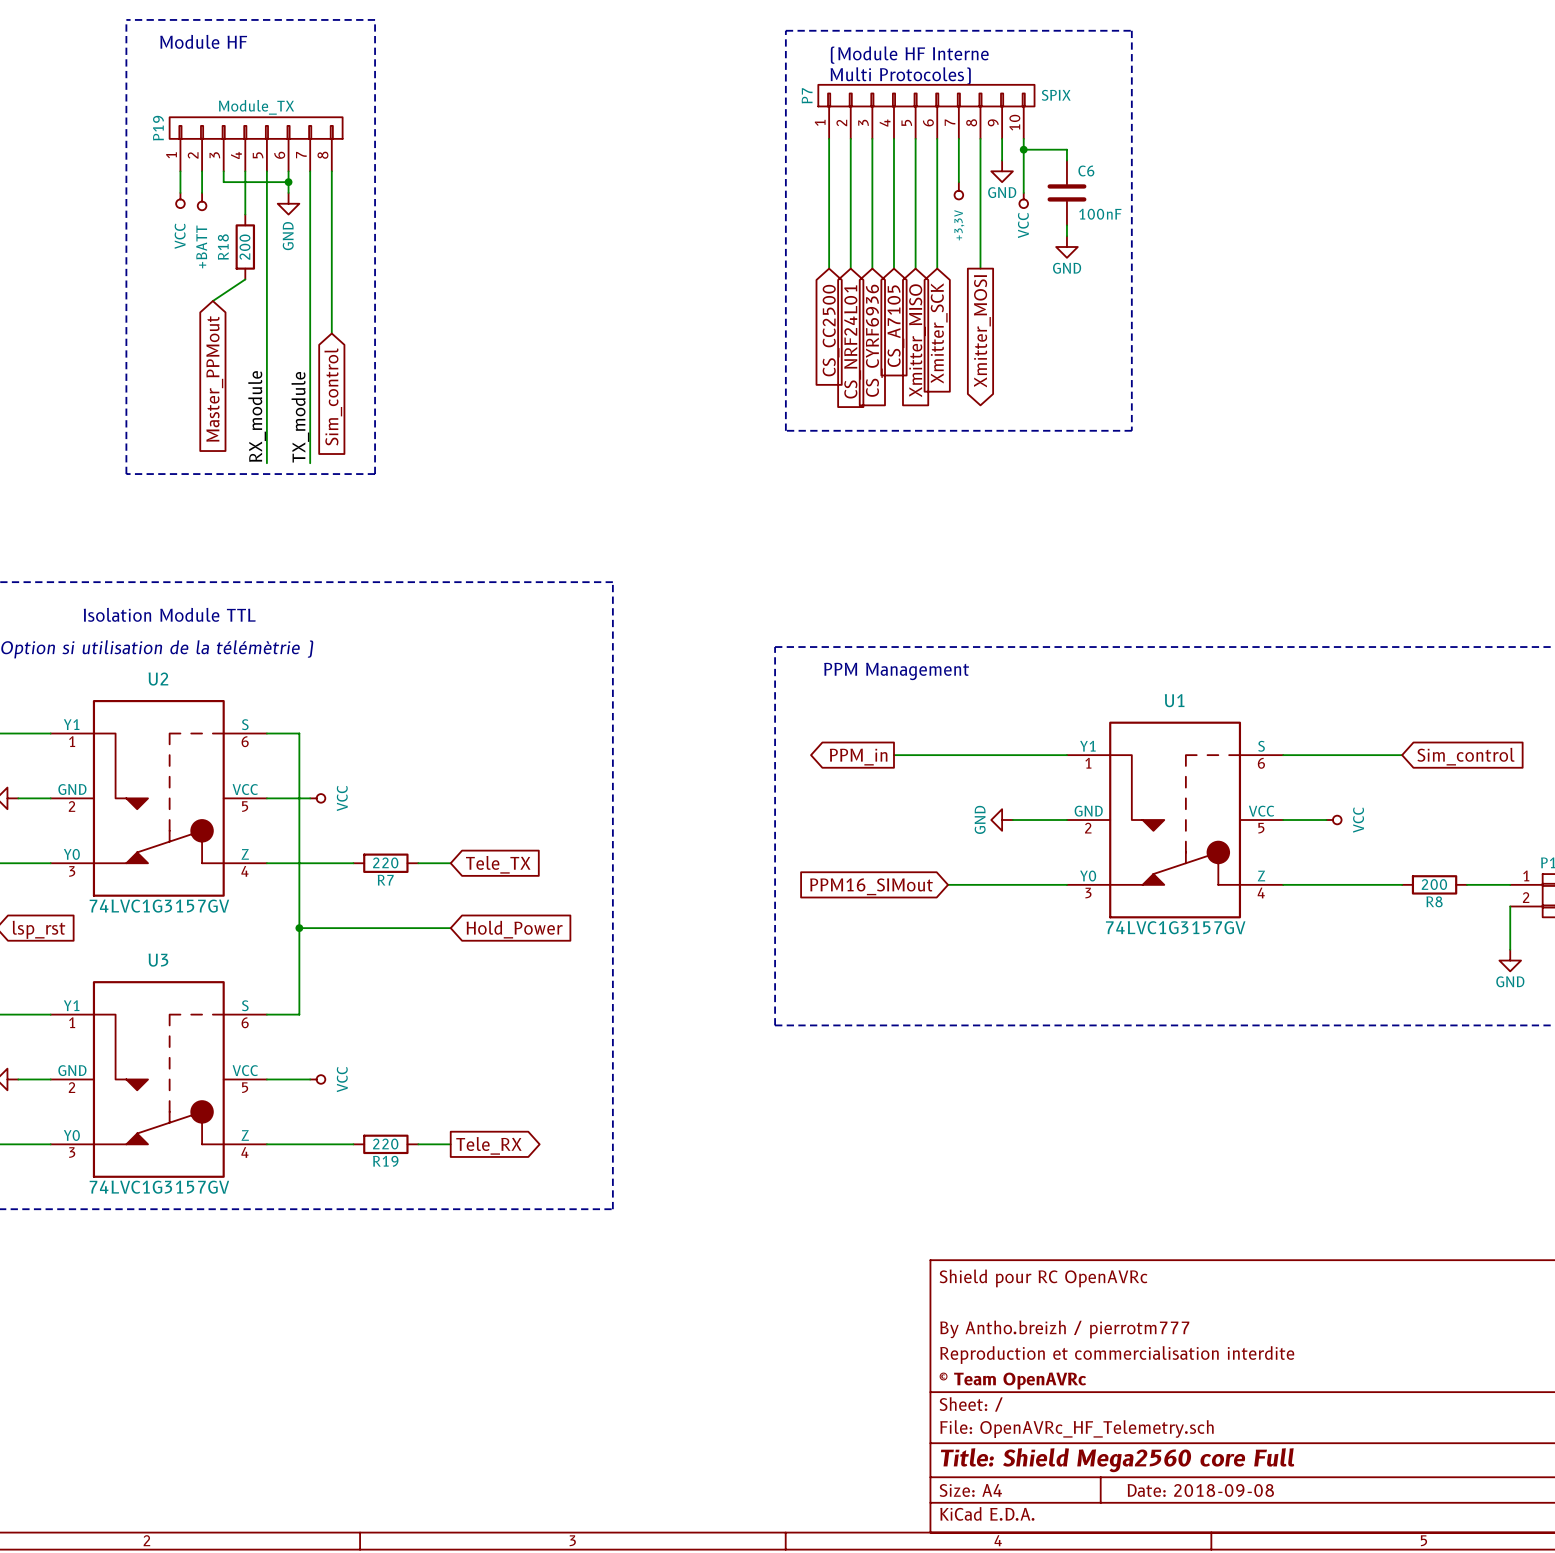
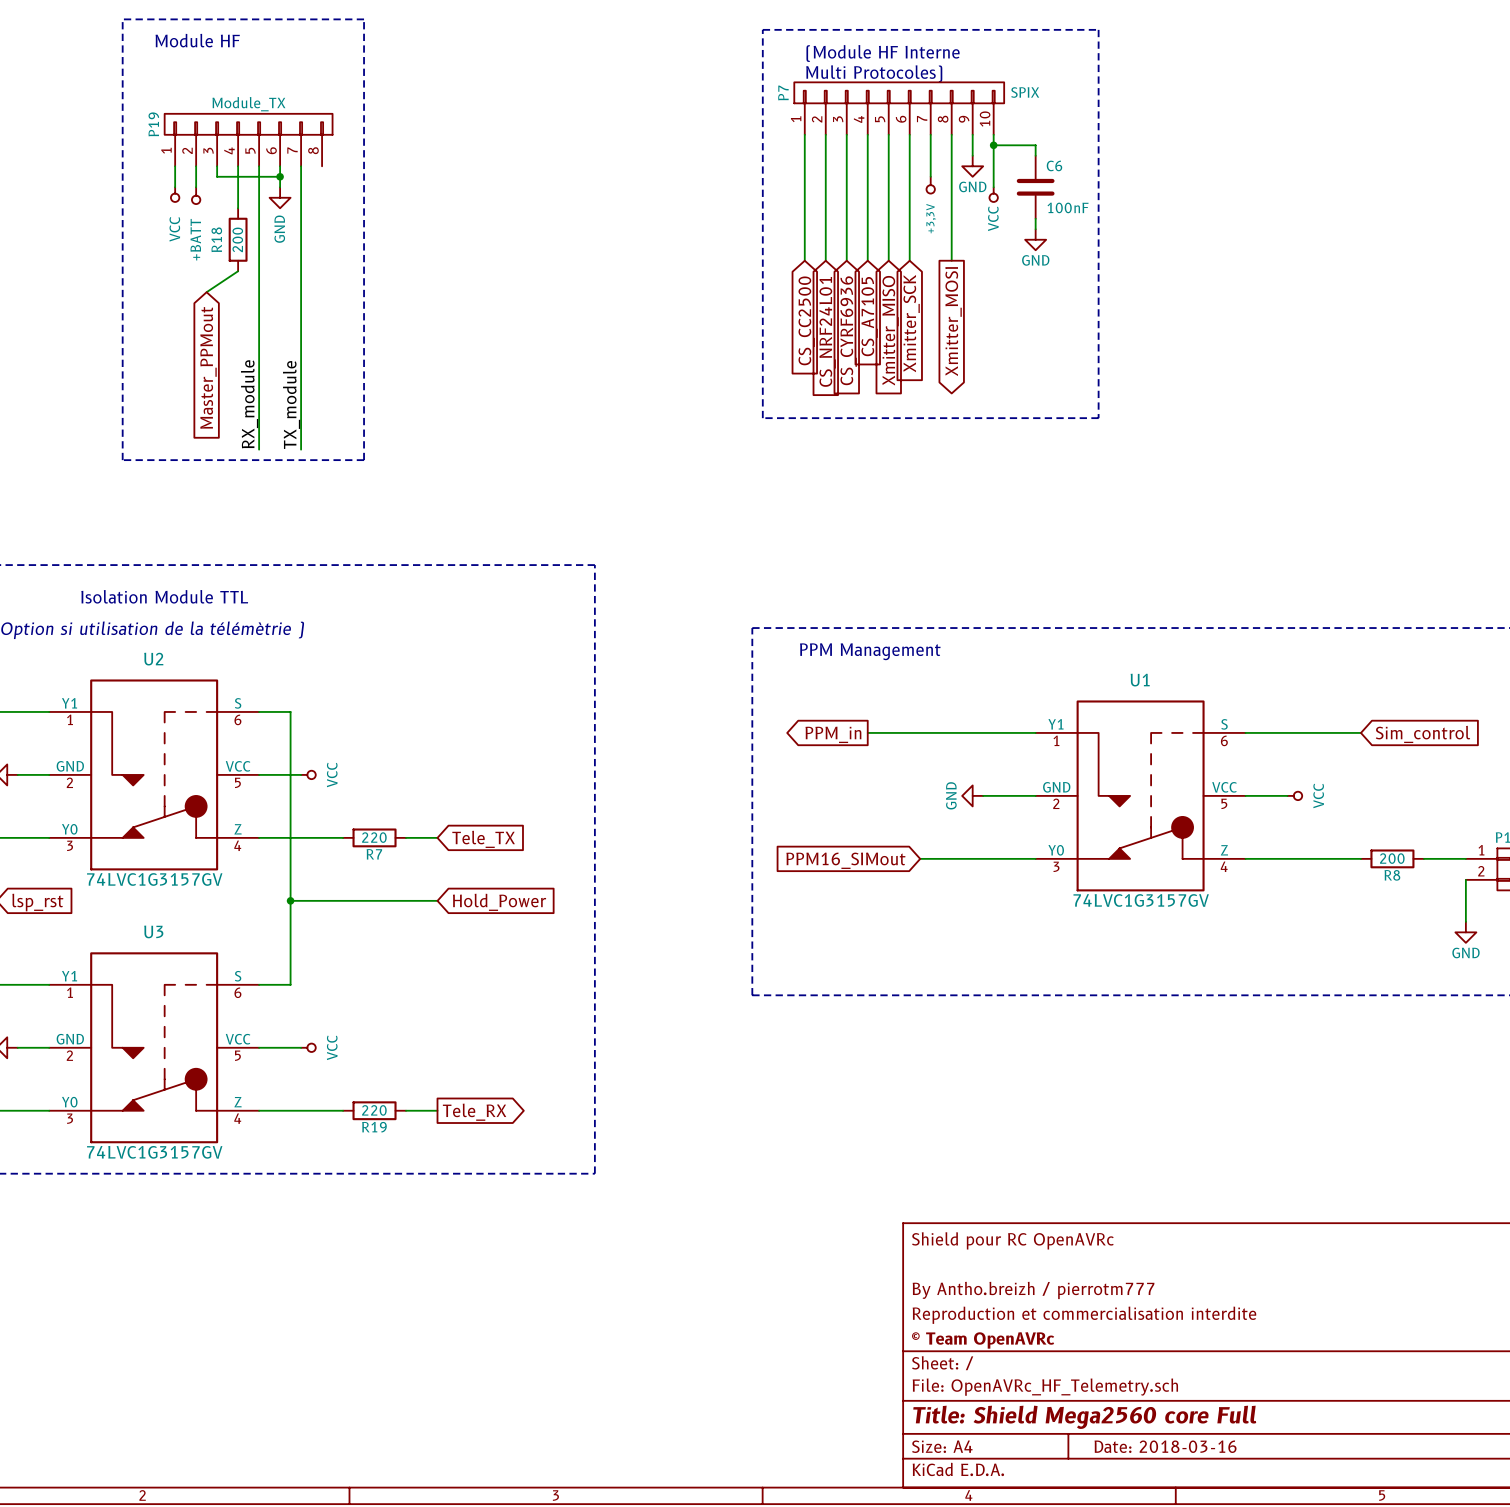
wire: (331, 171) (331, 333) -> none
global label: Sim_control (333, 396) -> none
title block: Date: 2018-09-08 (1200, 1490) -> Date: 2018-03-16 (1165, 1446)

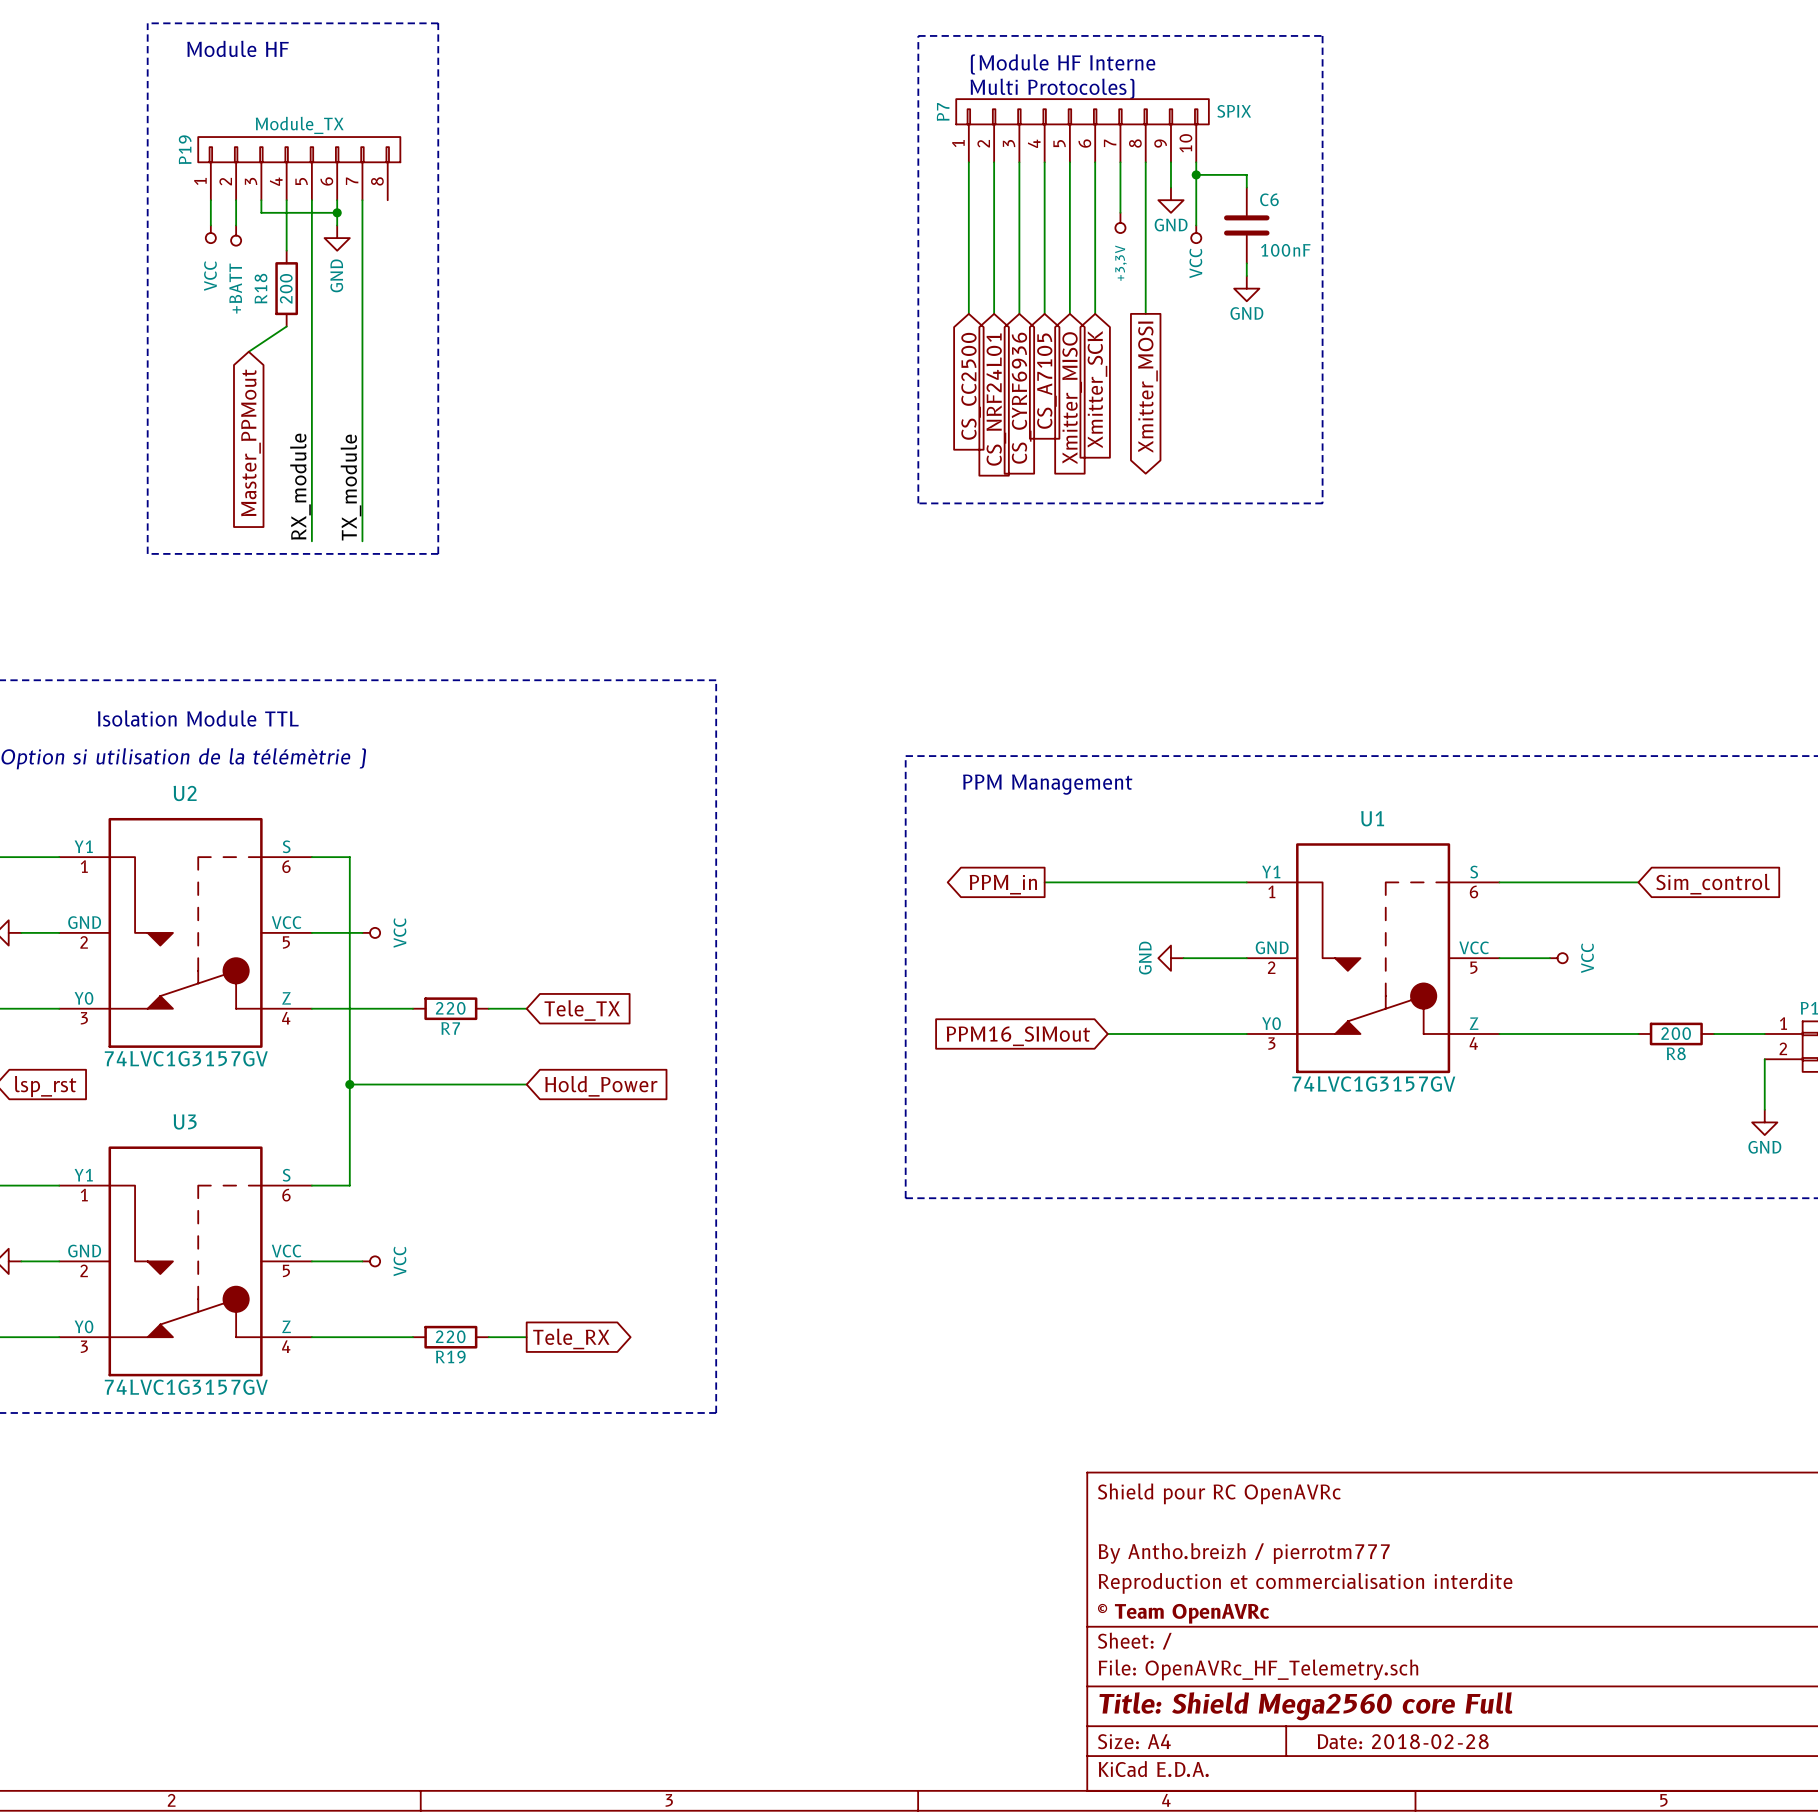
title block: Date: 2018-03-16 (1165, 1446) -> Date: 2018-02-28 (1403, 1741)

